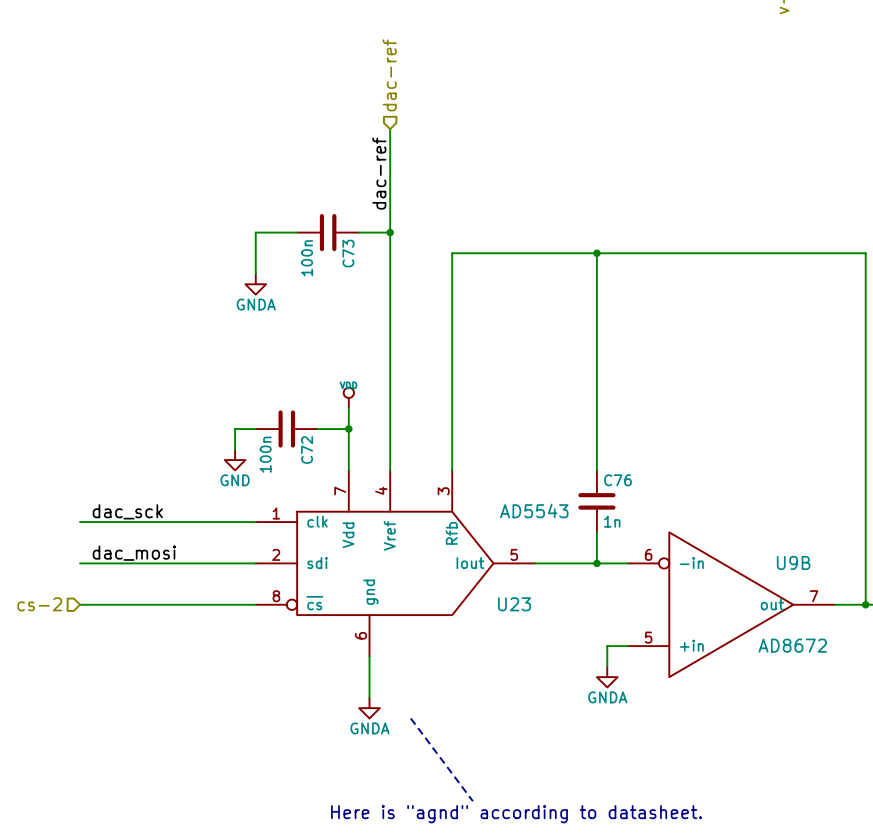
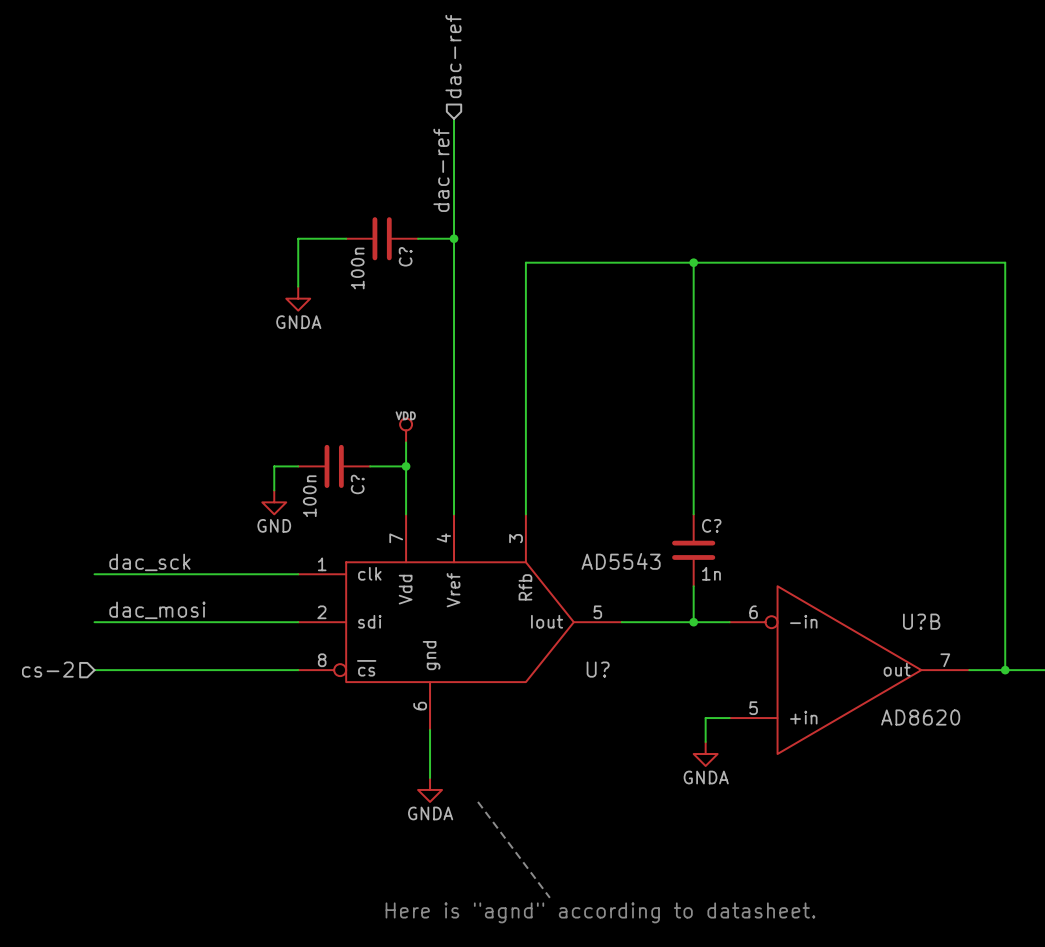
C73 name: C73 (348, 253) -> C? (405, 256)
C72 name: C72 (307, 450) -> C? (357, 484)
C76 name: C76 (617, 480) -> C? (711, 525)
U9B name: U9B (793, 562) -> U?B (921, 621)
U23 name: U23 (514, 604) -> U? (598, 669)
U9B value: AD8672 (792, 645) -> AD8620 (920, 717)

